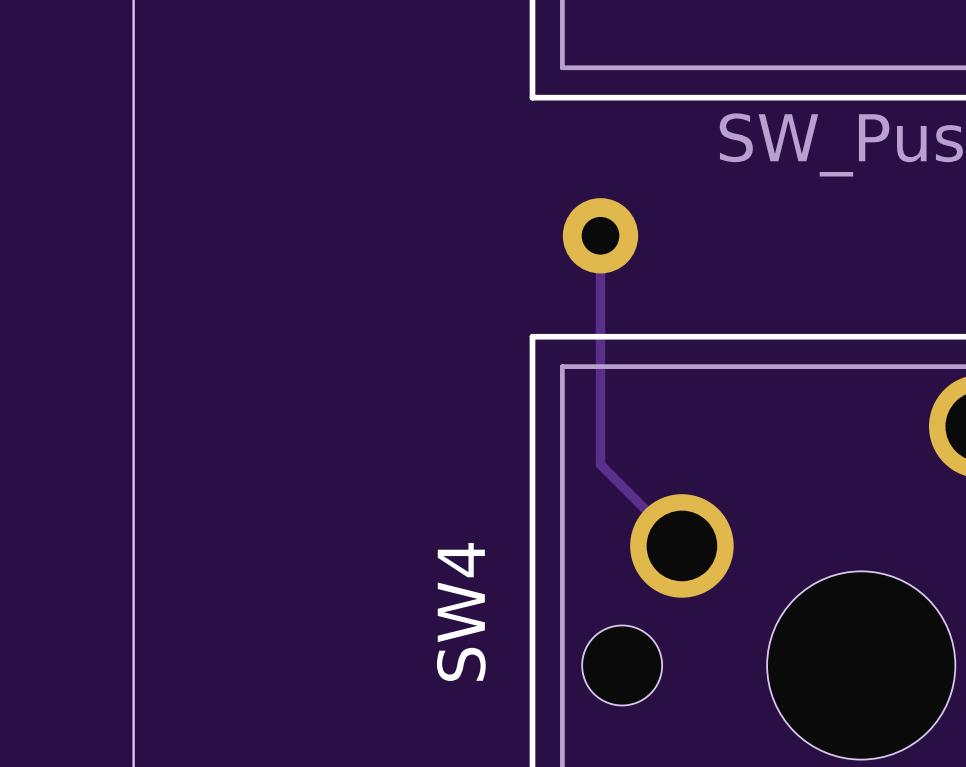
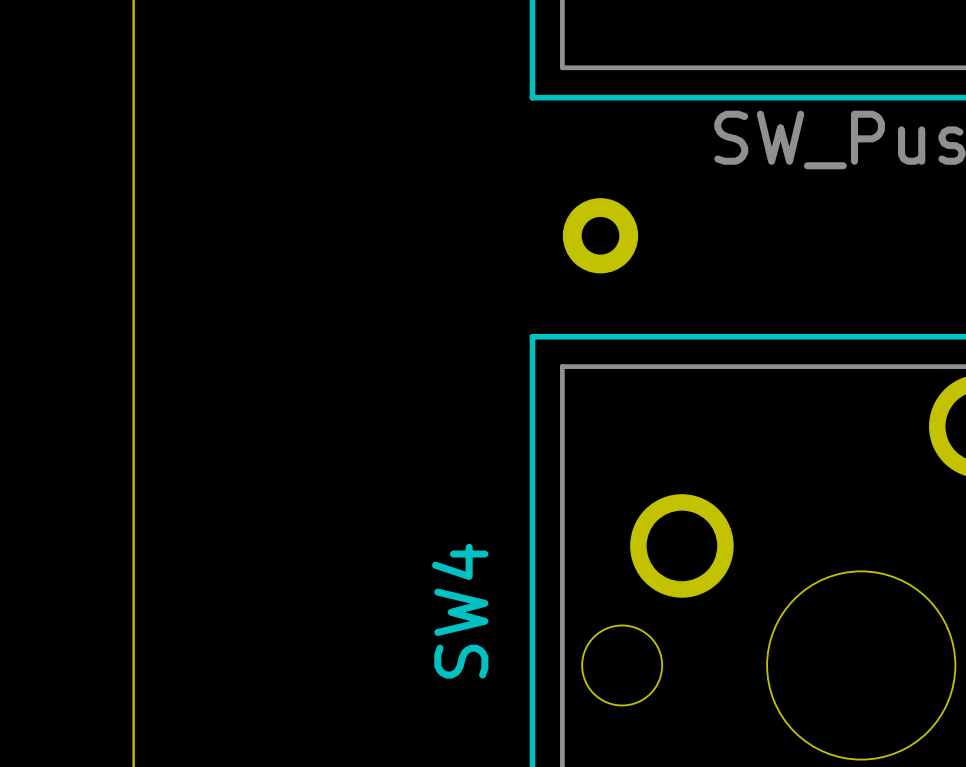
track: (600, 235) (600, 464) (681, 545) -> none

